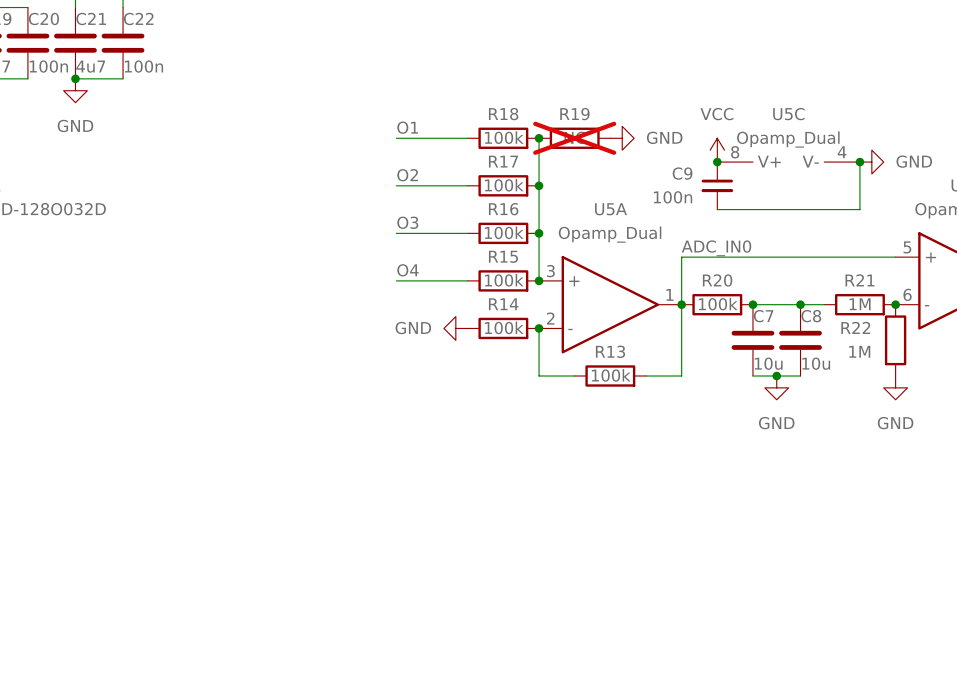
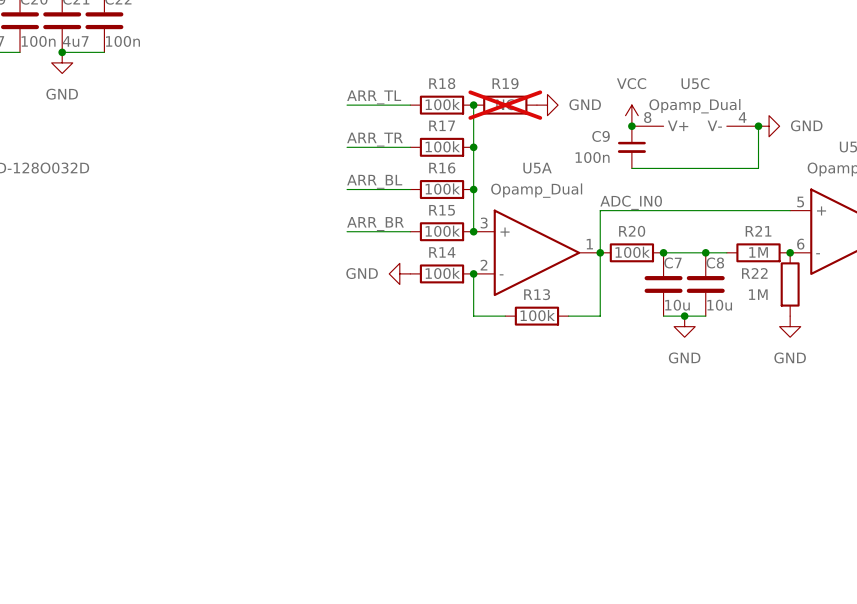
label: O1 (407, 127) -> ARR_TL (374, 97)
label: O2 (407, 175) -> ARR_TR (374, 139)
label: O3 (407, 222) -> ARR_BL (374, 181)
label: O4 (408, 270) -> ARR_BR (375, 224)

